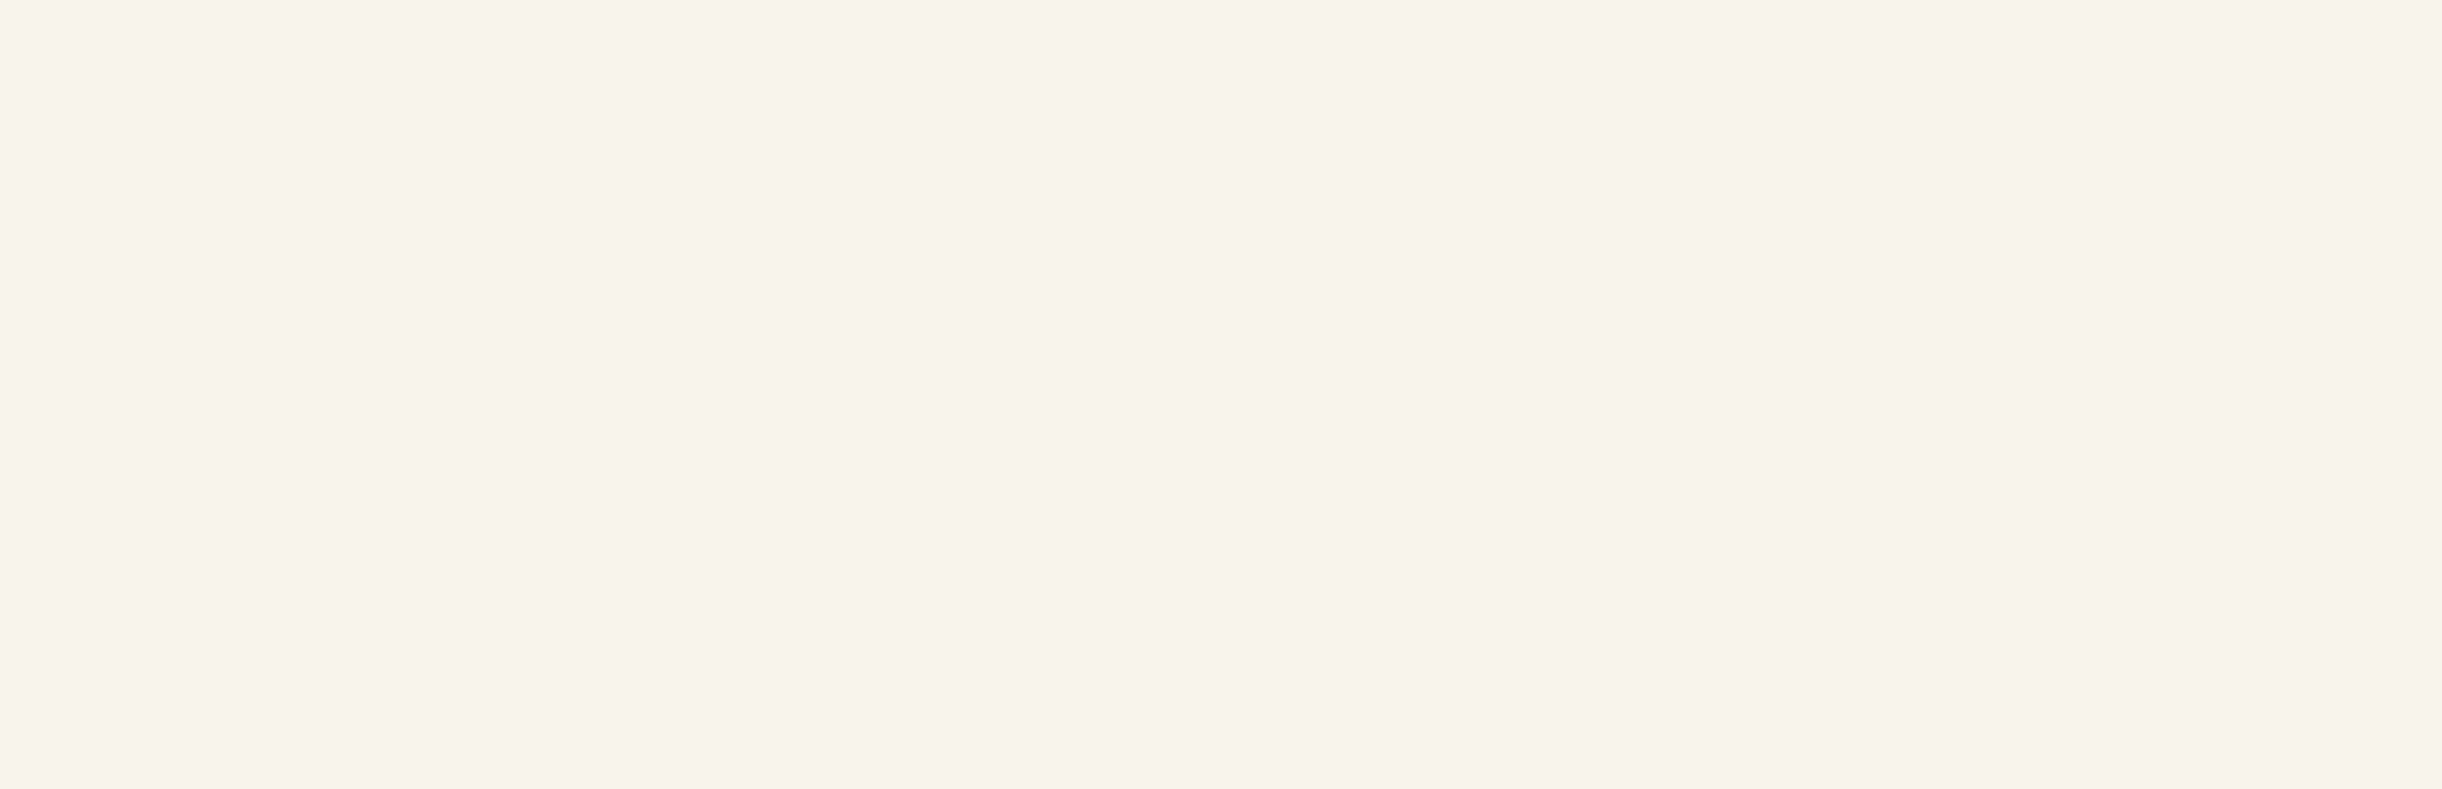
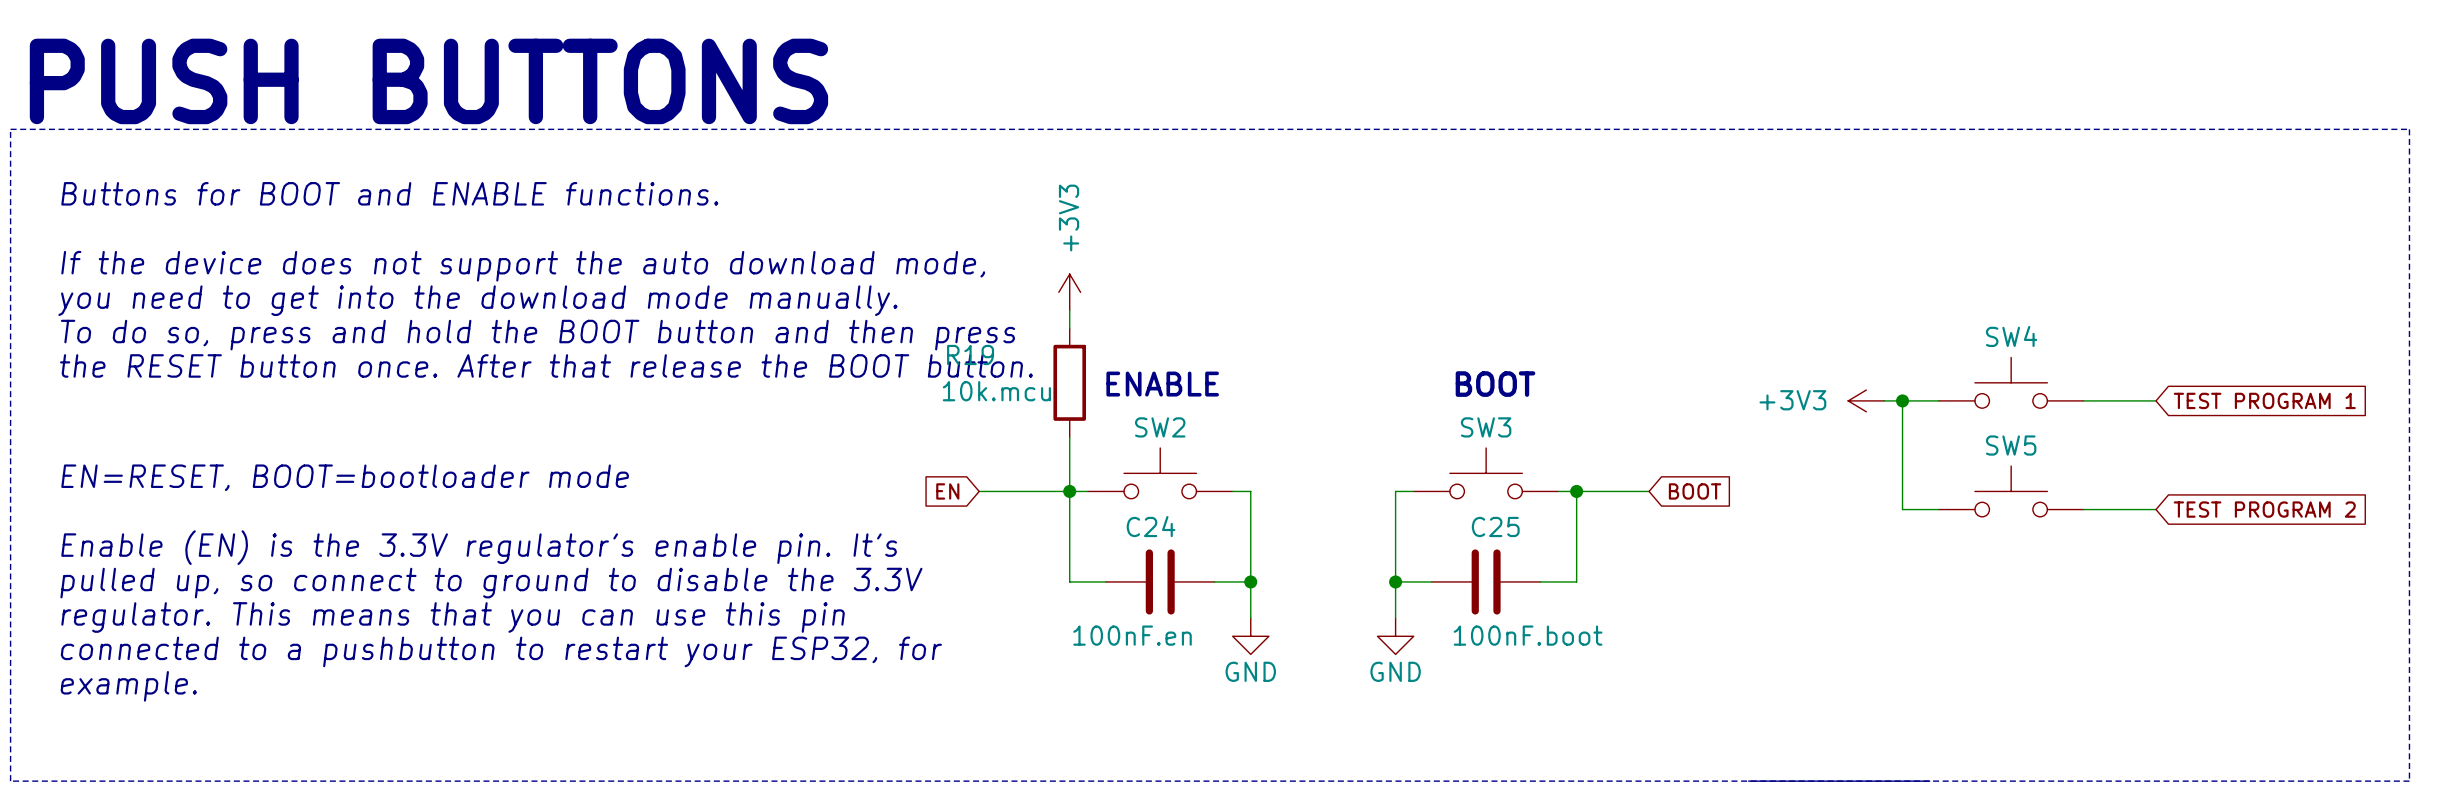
text: none -> PUSH BUTTONS (428, 81)
line: none -> (10, 129) (2409, 129) (2409, 781) (10, 781) (10, 129)
text: none -> Buttons for BOOT and ENABLE functions. (389, 193)
text: none -> If the device does not support the auto download mode, (523, 266)
power symbol: none -> +3V3 (1069, 292)
text: none -> you need to get into the download mode manually. (477, 300)
wire: none -> (1069, 310) (1069, 328)
text: none -> To do so, press and hold the BOOT button and then press (538, 335)
text: none -> the RESET button once. After that release the BOOT button. (546, 365)
R19: none -> 10k.mcu (1069, 382)
SW4: none -> (2011, 382)
text: none -> ENABLE (1162, 384)
text: none -> BOOT (1495, 384)
power symbol: none -> +3V3 (1866, 400)
wire: none -> (1884, 400) (1938, 400)
wire: none -> (1902, 400) (1902, 509) (1938, 509)
junction: none -> (1902, 400)
wire: none -> (2083, 400) (2156, 400)
global label: none -> TEST PROGRAM 1 (2264, 400)
wire: none -> (1069, 437) (1069, 581) (1105, 581)
SW2: none -> (1160, 473)
SW3: none -> (1486, 473)
text: none -> EN=RESET, BOOT=bootloader mode (345, 477)
global label: none -> EN (947, 491)
wire: none -> (979, 491) (1087, 491)
junction: none -> (1069, 491)
wire: none -> (1232, 491) (1250, 491) (1250, 618)
wire: none -> (1413, 491) (1395, 491) (1395, 618)
wire: none -> (1558, 491) (1649, 491)
wire: none -> (1576, 491) (1576, 581) (1540, 581)
junction: none -> (1576, 491)
global label: none -> BOOT (1695, 491)
SW5: none -> (2011, 491)
wire: none -> (2083, 509) (2156, 509)
global label: none -> TEST PROGRAM 2 (2264, 509)
text: none -> Enable (EN) is the 3.3V regulator's enable pin. It's (479, 547)
C24: none -> 100nF.en (1160, 581)
wire: none -> (1214, 581) (1250, 581)
junction: none -> (1250, 581)
wire: none -> (1395, 581) (1431, 581)
junction: none -> (1395, 581)
C25: none -> 100nF.boot (1486, 581)
text: none -> pulled up, so connect to ground to disable the 3.3V (491, 583)
text: none -> regulator. This means that you can use this pin (453, 617)
power symbol: none -> GND (1250, 636)
power symbol: none -> GND (1395, 636)
text: none -> connected to a pushbutton to restart your ESP32, for (501, 651)
text: none -> example. (128, 686)
line: none -> (1748, 781) (1929, 781)

